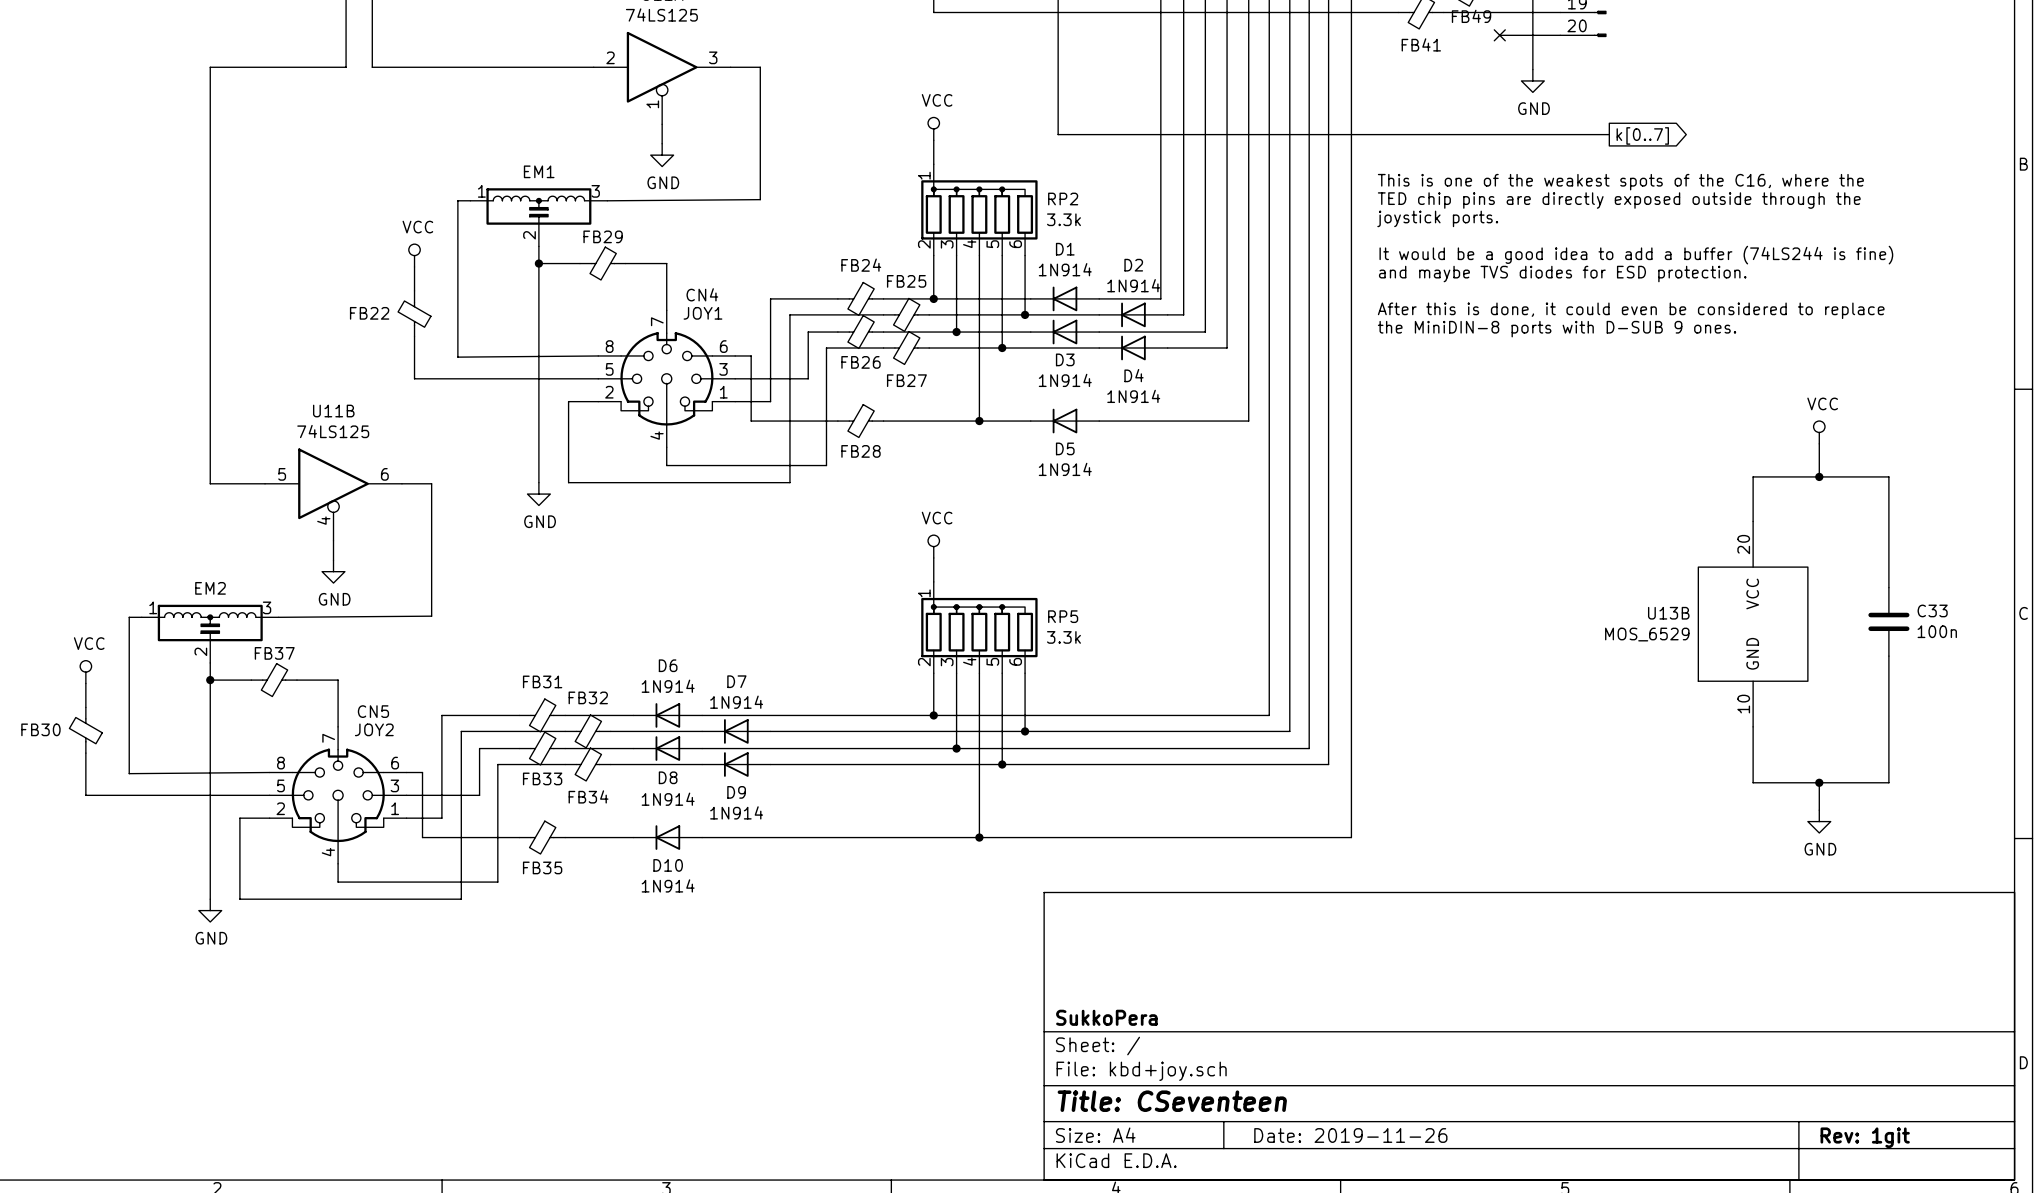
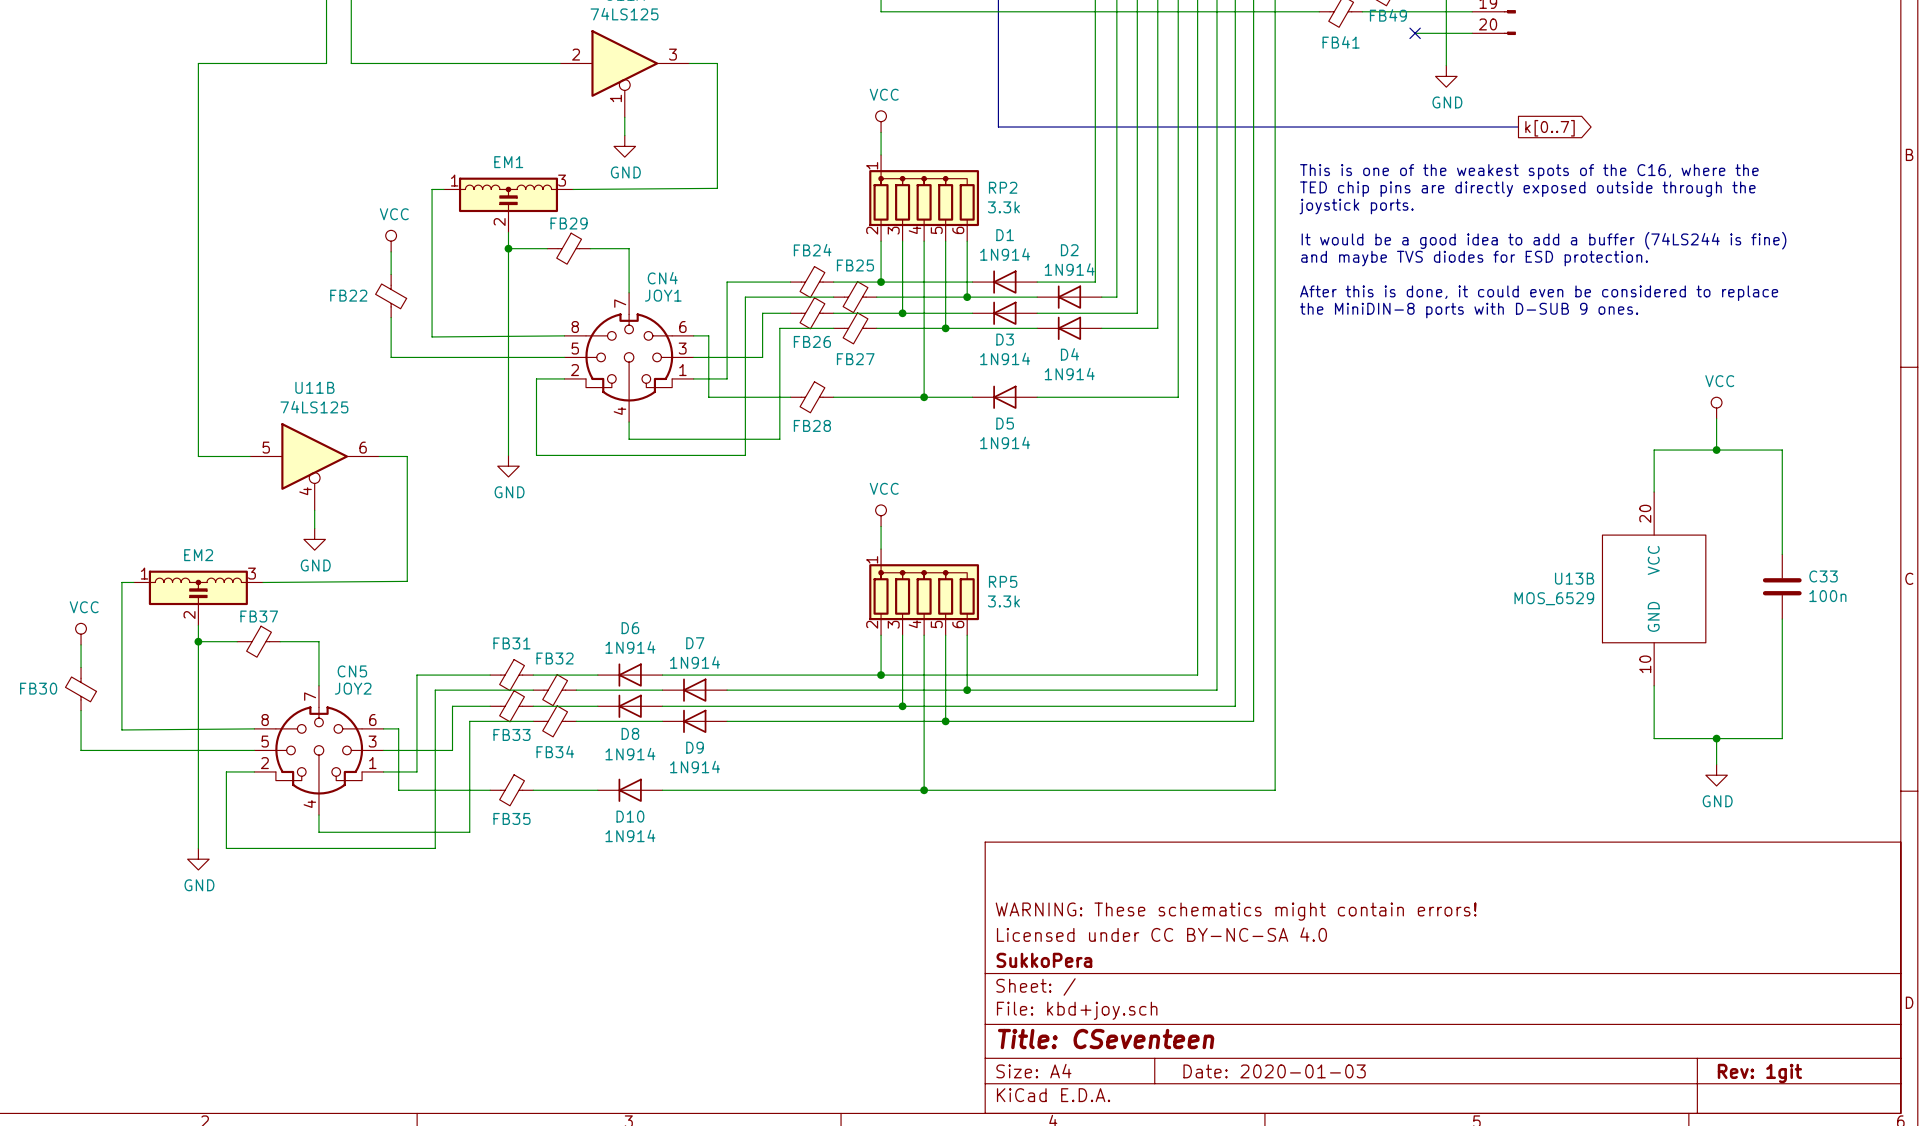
title block: none -> WARNING: These schematics might contain errors! (1236, 911)
title block: none -> Licensed under CC BY-NC-SA 4.0 (1161, 934)
title block: Date: 2019-11-26 (1350, 1135) -> Date: 2020-01-03 (1274, 1071)

